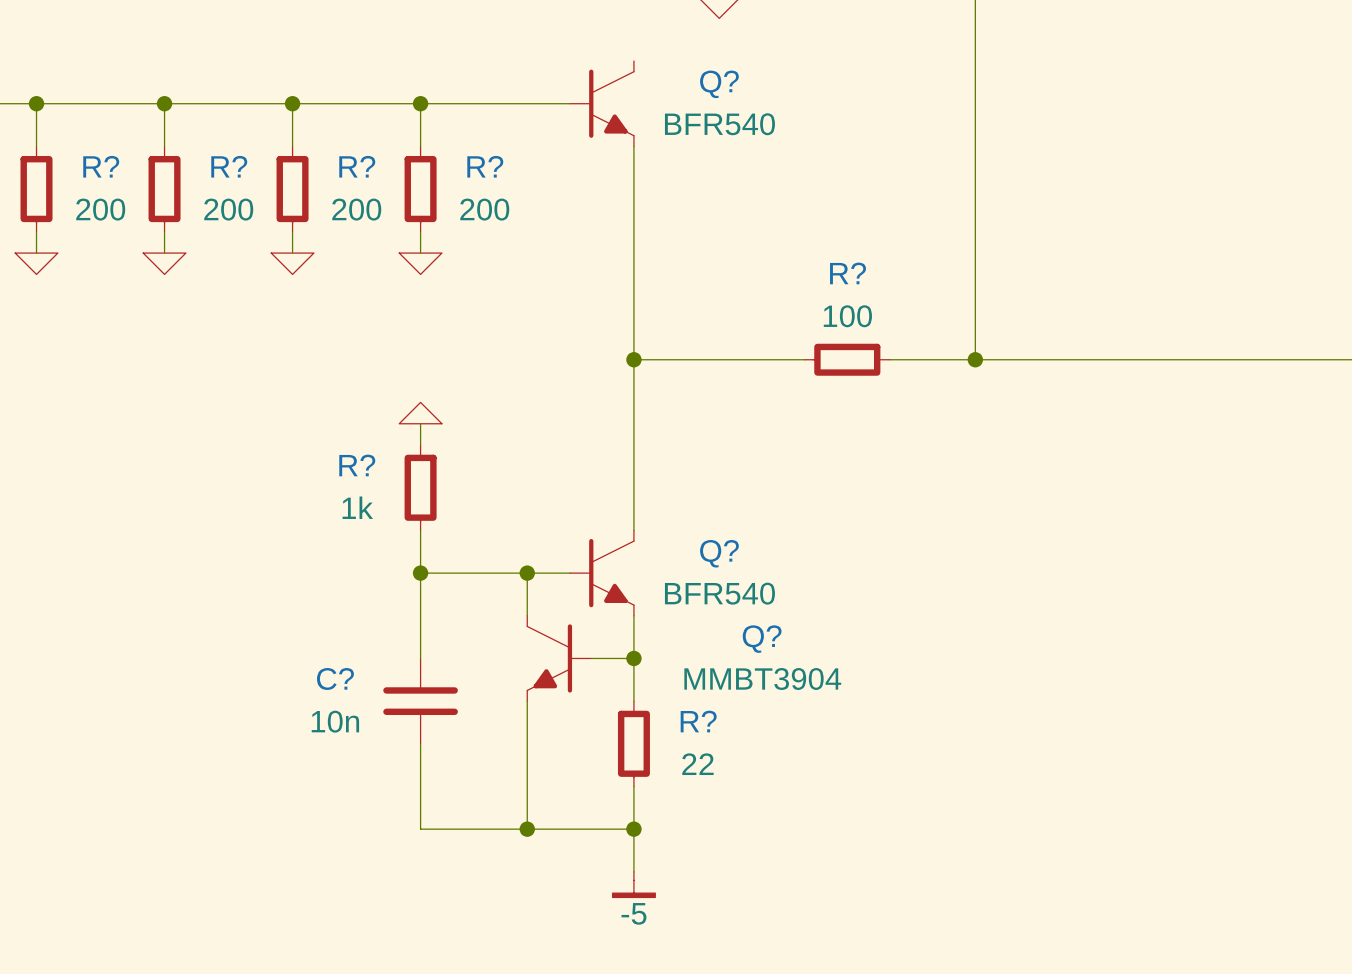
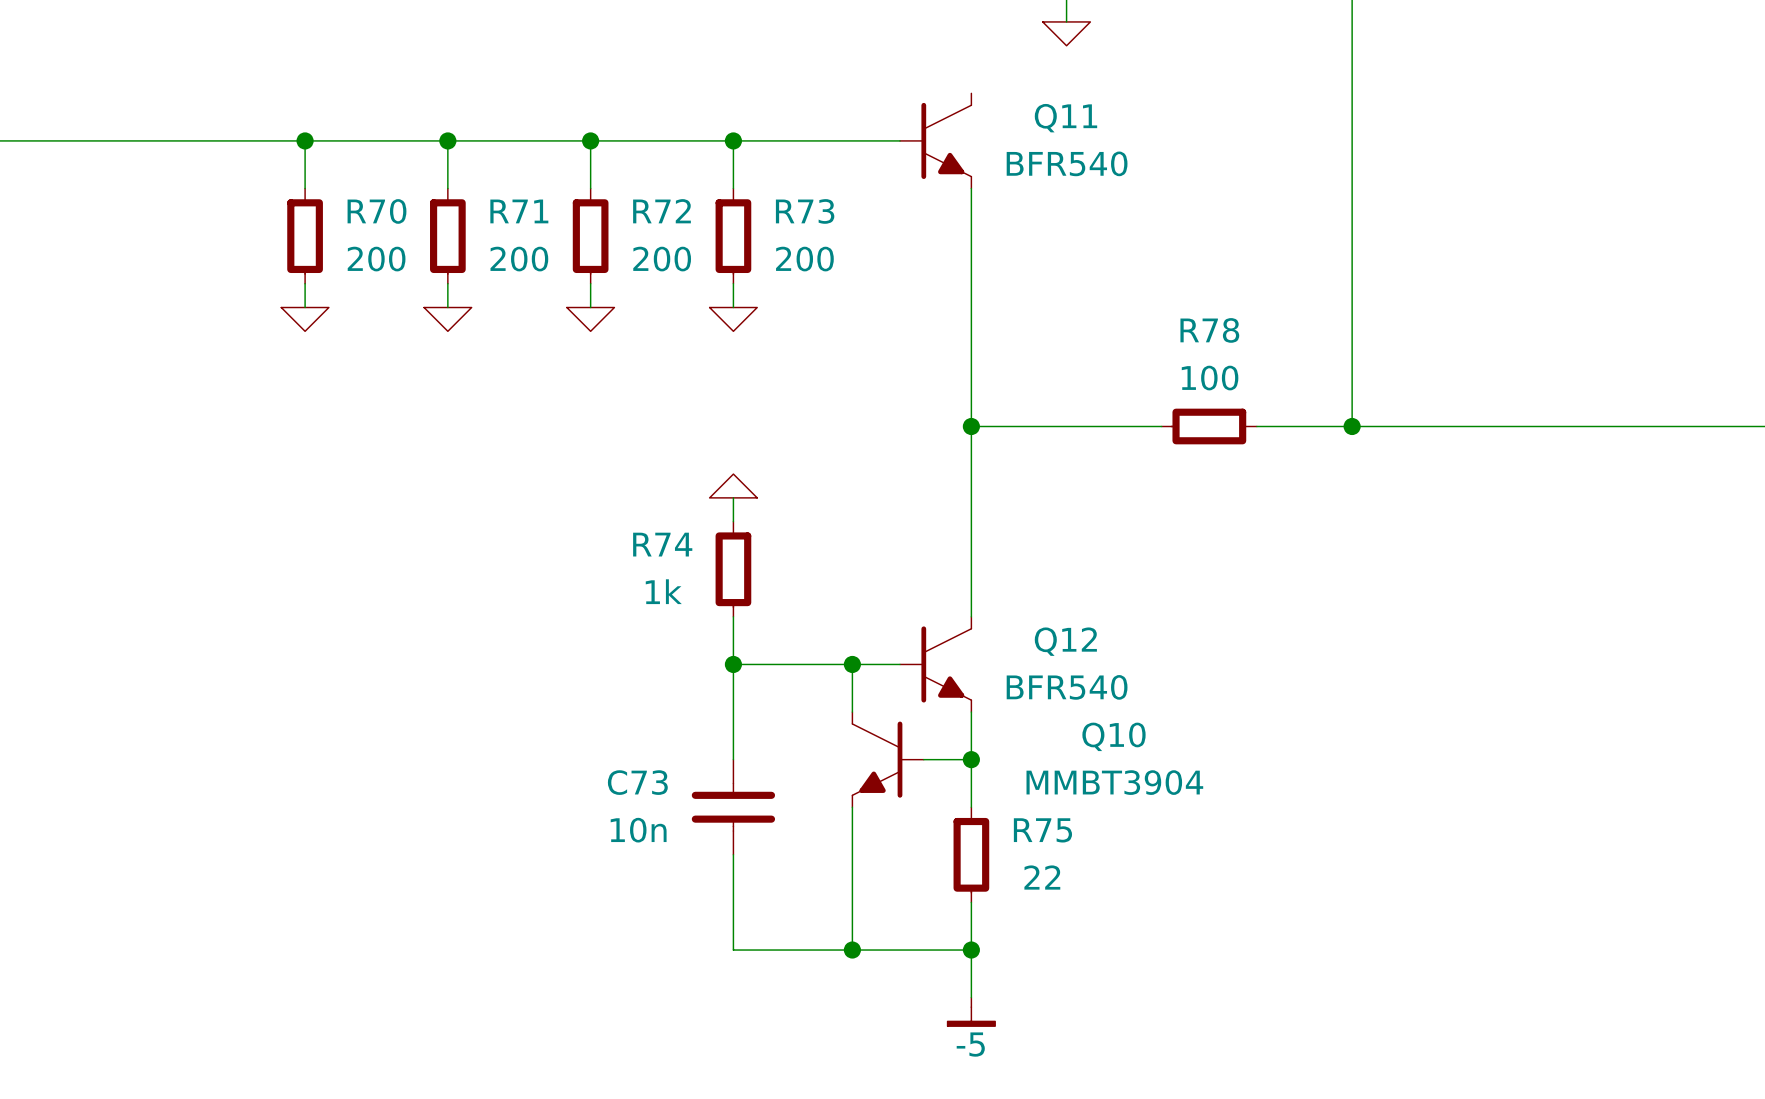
Q? name: Q? (719, 84) -> Q11 (1065, 118)
R? name: R? (101, 166) -> R70 (376, 211)
R? name: R? (229, 166) -> R71 (519, 211)
R? name: R? (357, 166) -> R72 (661, 211)
R? name: R? (485, 166) -> R73 (805, 211)
R? name: R? (848, 273) -> R78 (1209, 330)
R? name: R? (357, 465) -> R74 (662, 544)
Q? name: Q? (719, 553) -> Q12 (1065, 641)
Q? name: Q? (762, 639) -> Q10 (1113, 736)
C? name: C? (335, 678) -> C73 (637, 782)
R? name: R? (698, 721) -> R75 (1042, 830)

